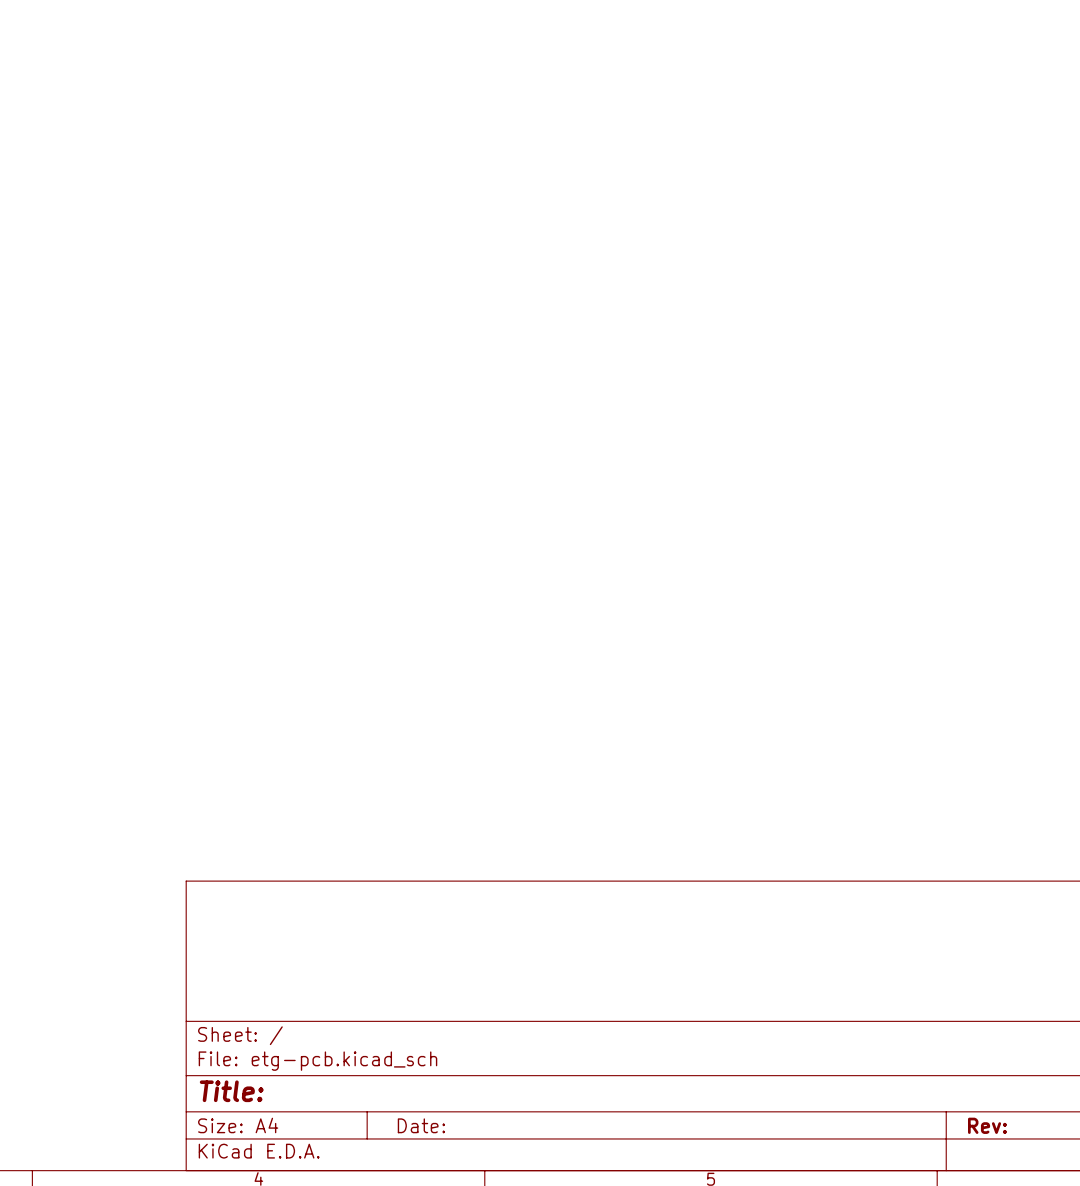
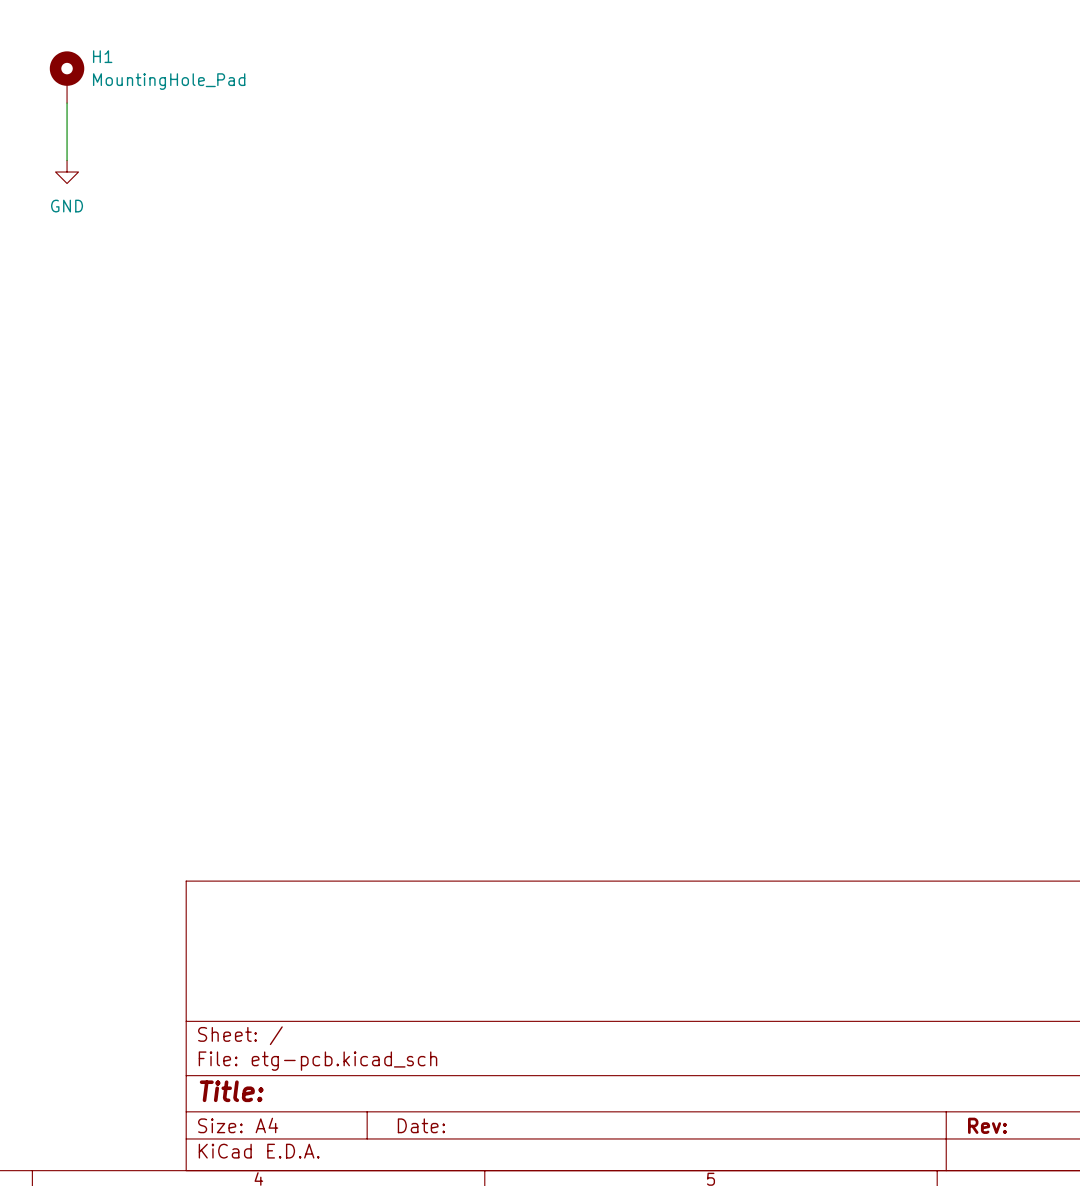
H1: none -> MountingHole_Pad (67, 77)
wire: none -> (67, 103) (67, 160)
power symbol: none -> GND (67, 172)

